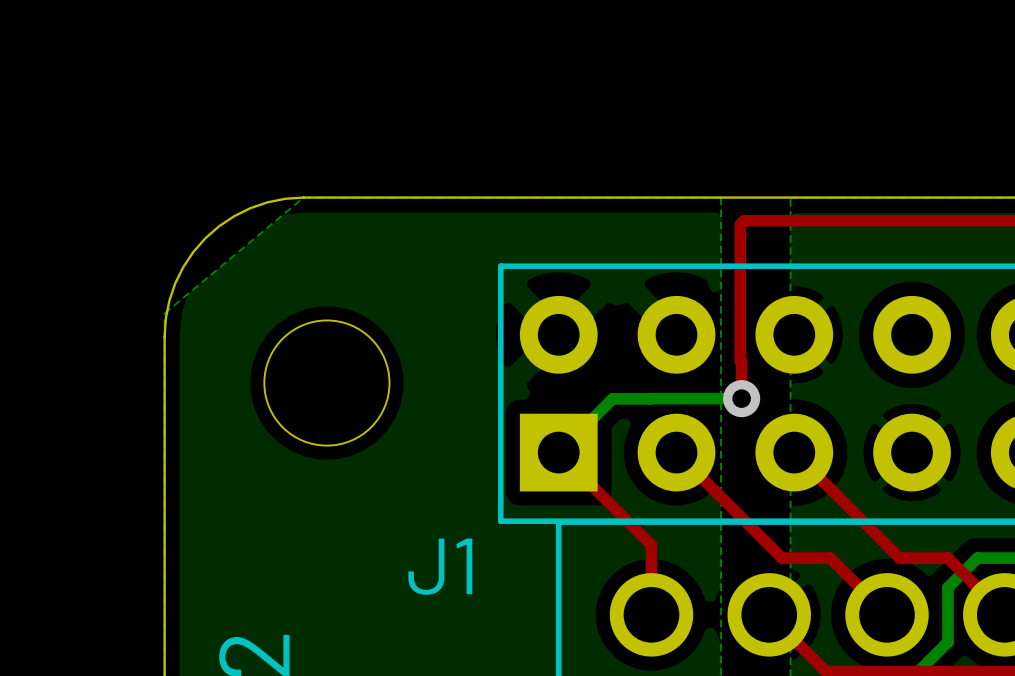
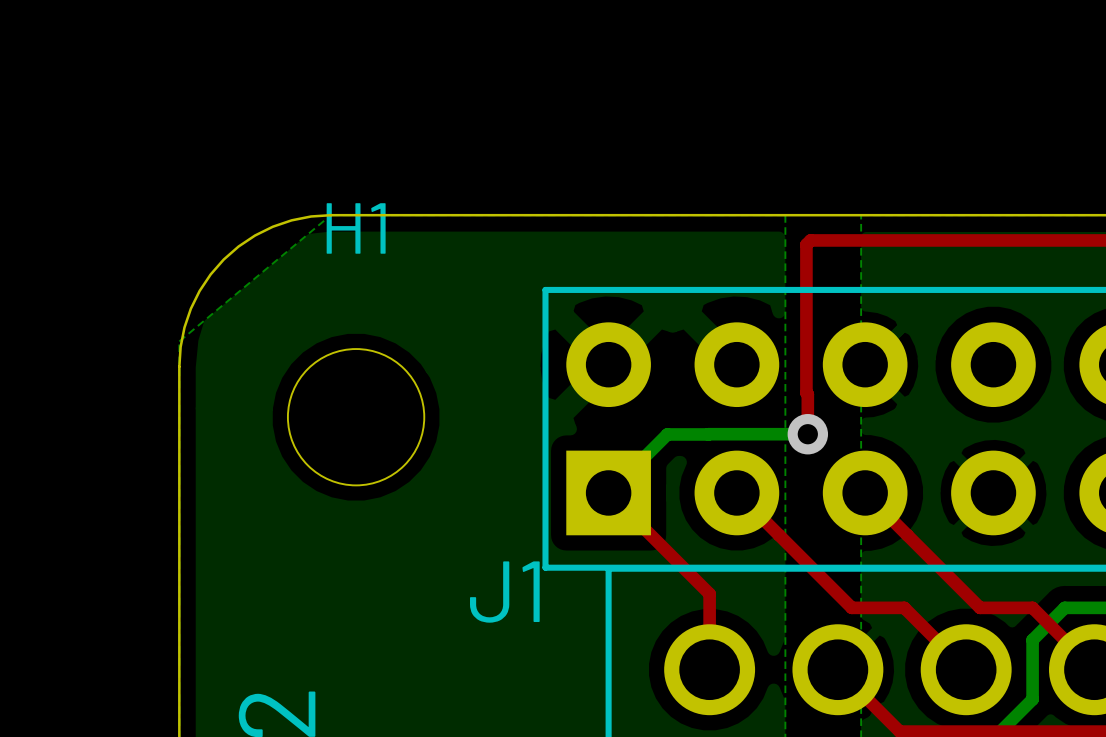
H1 name: none -> H1 (356, 228)
J1 name position: J1 (440, 566) -> J1 (504, 592)

